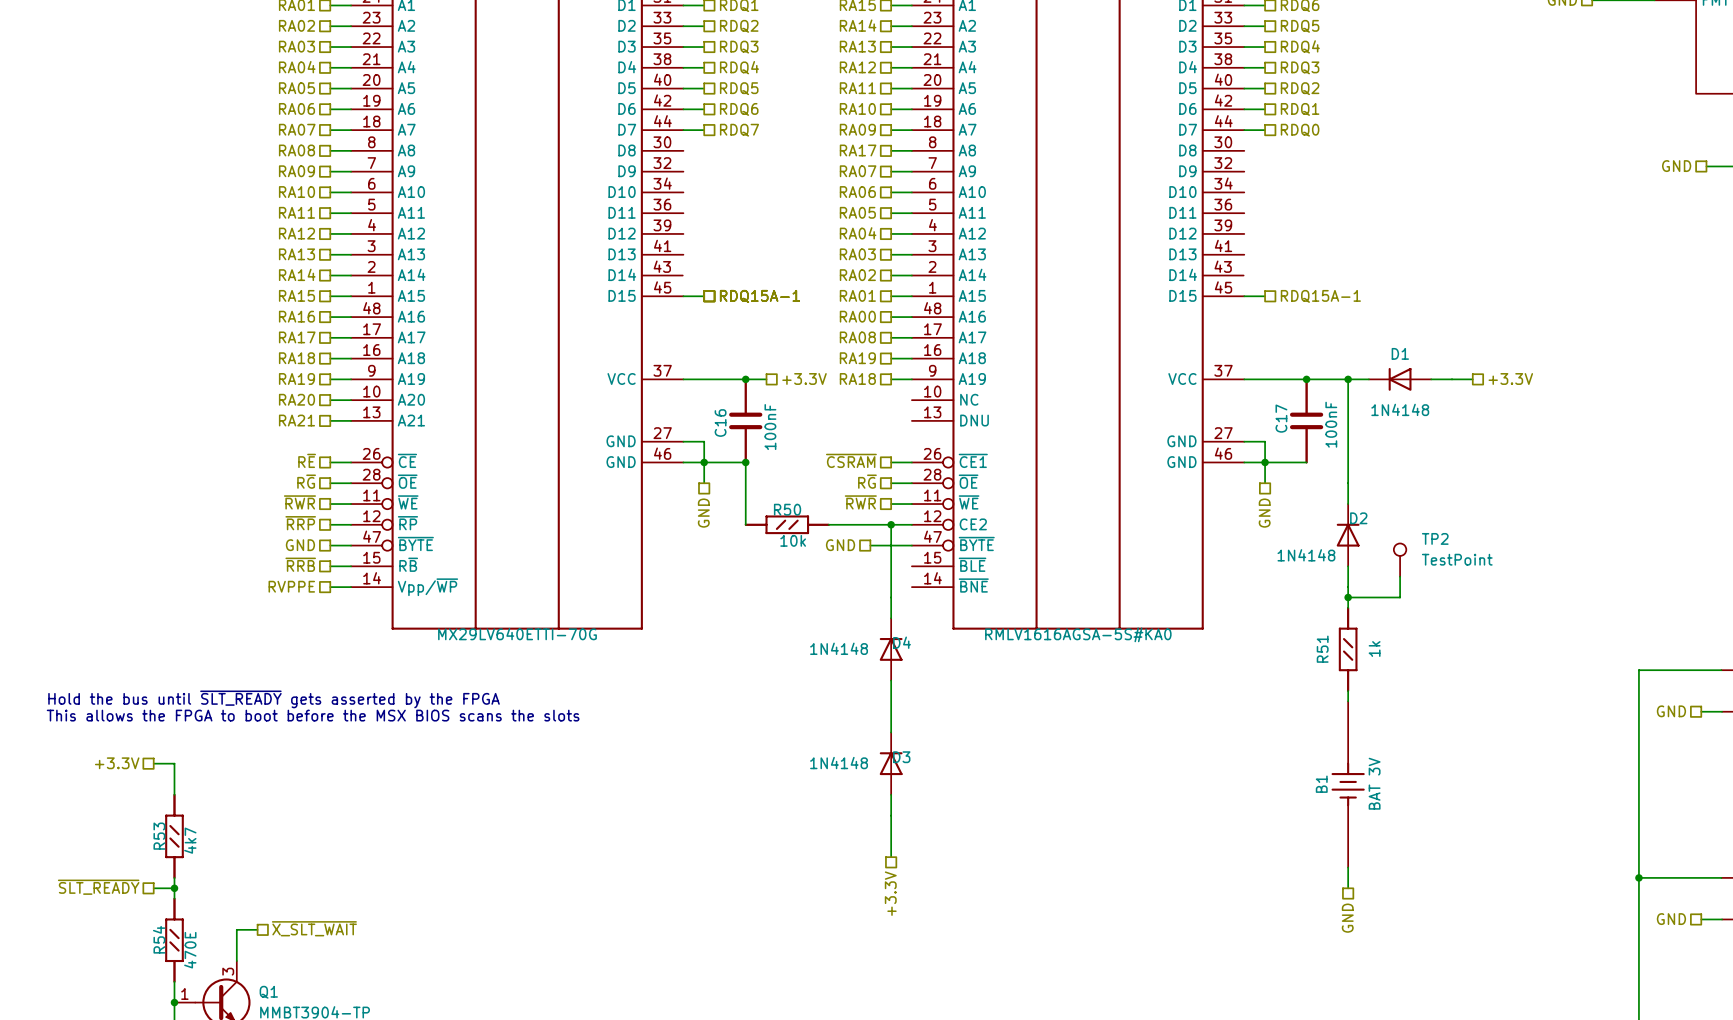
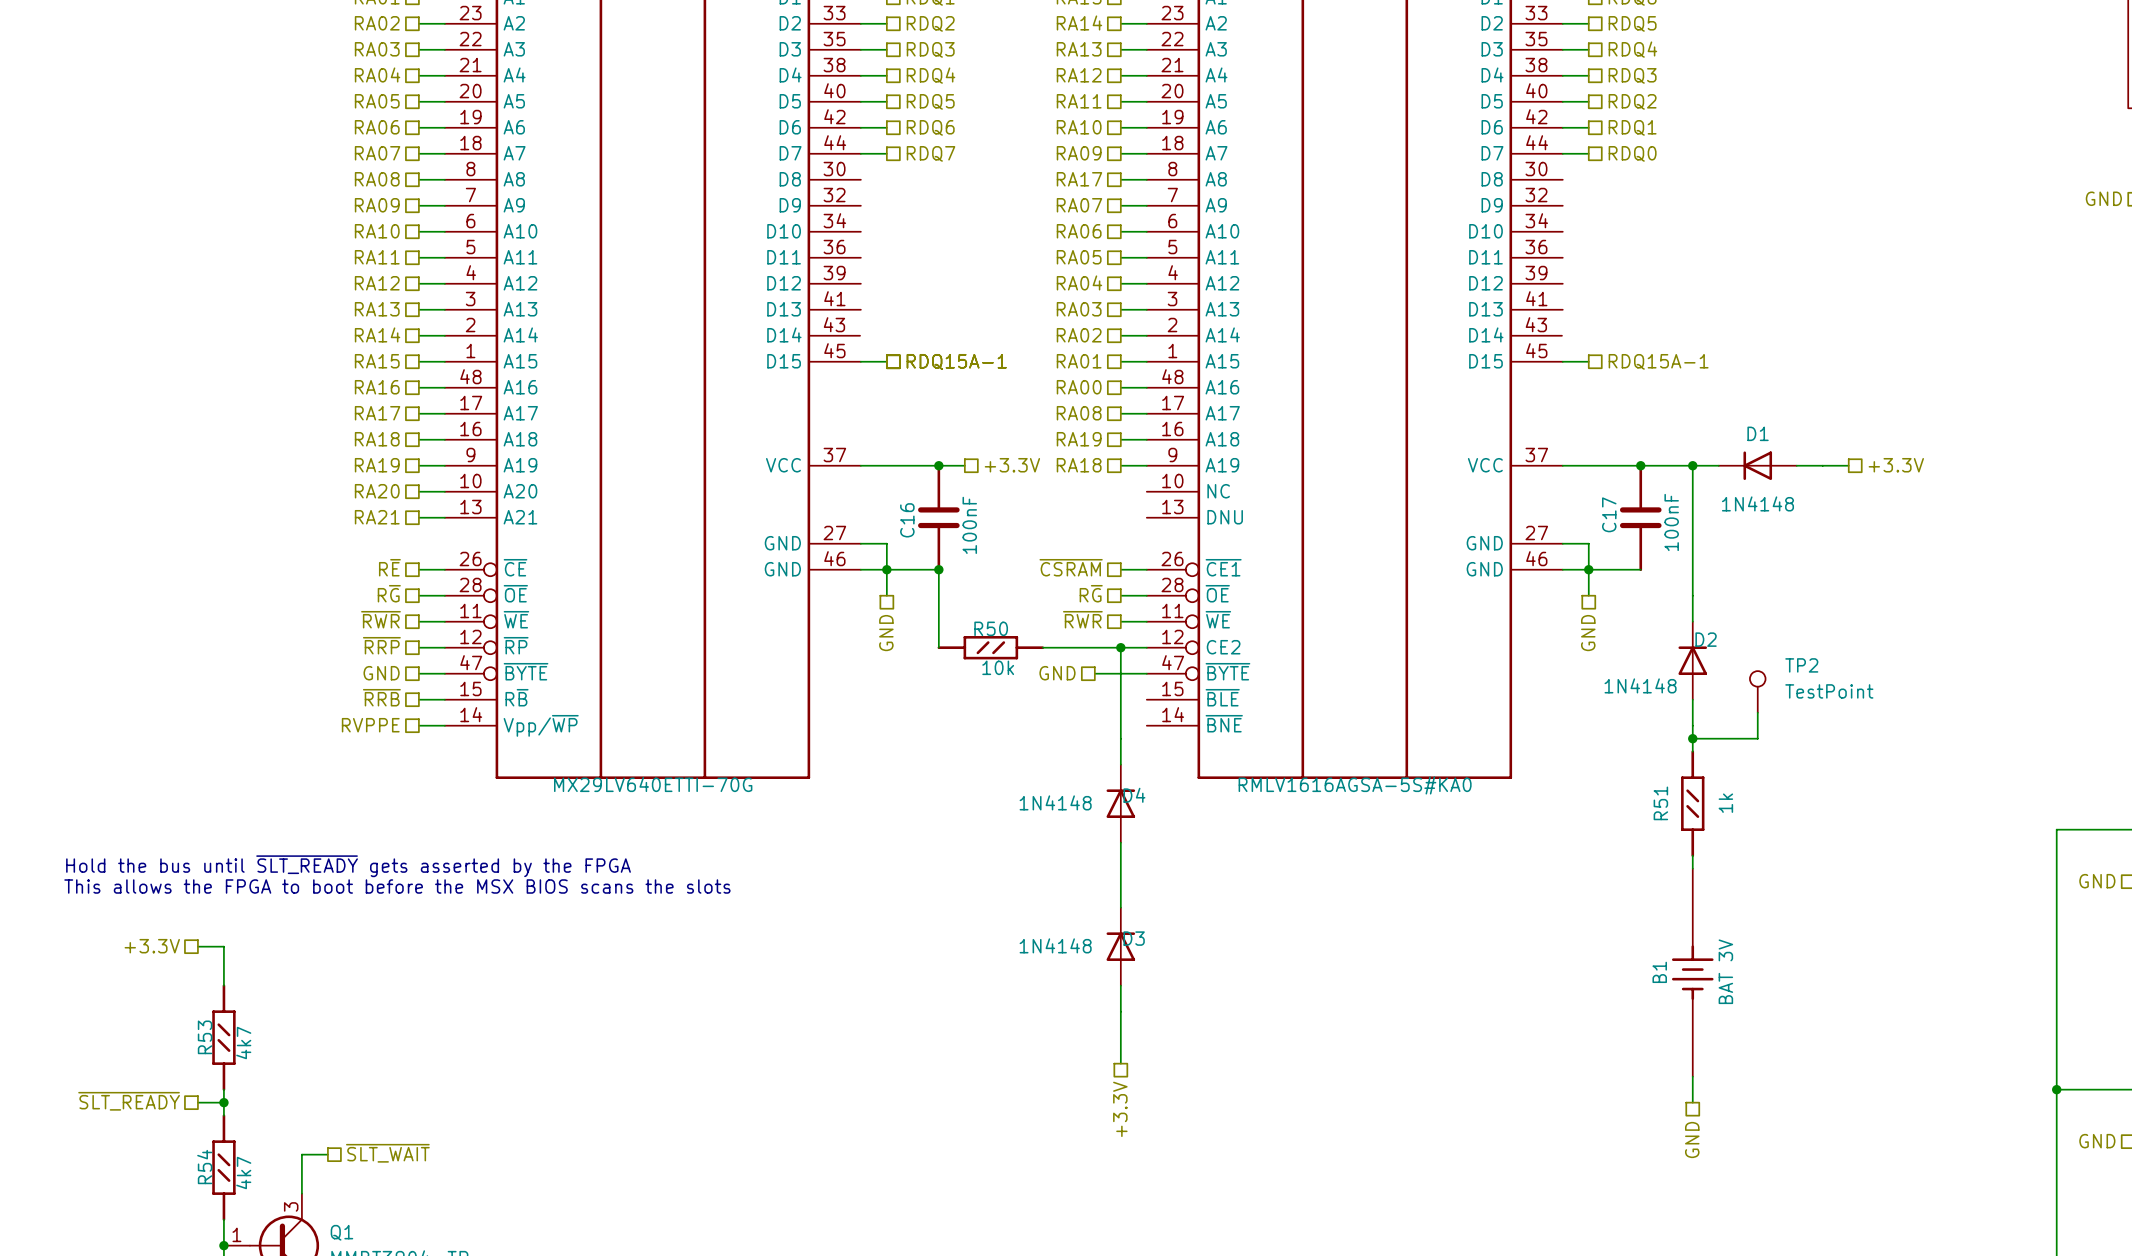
hierarchical label: ~{X_SLT_WAIT} (314, 928) -> ~{SLT_WAIT} (387, 1153)
R54 value: 470E (190, 950) -> 4k7 (243, 1173)

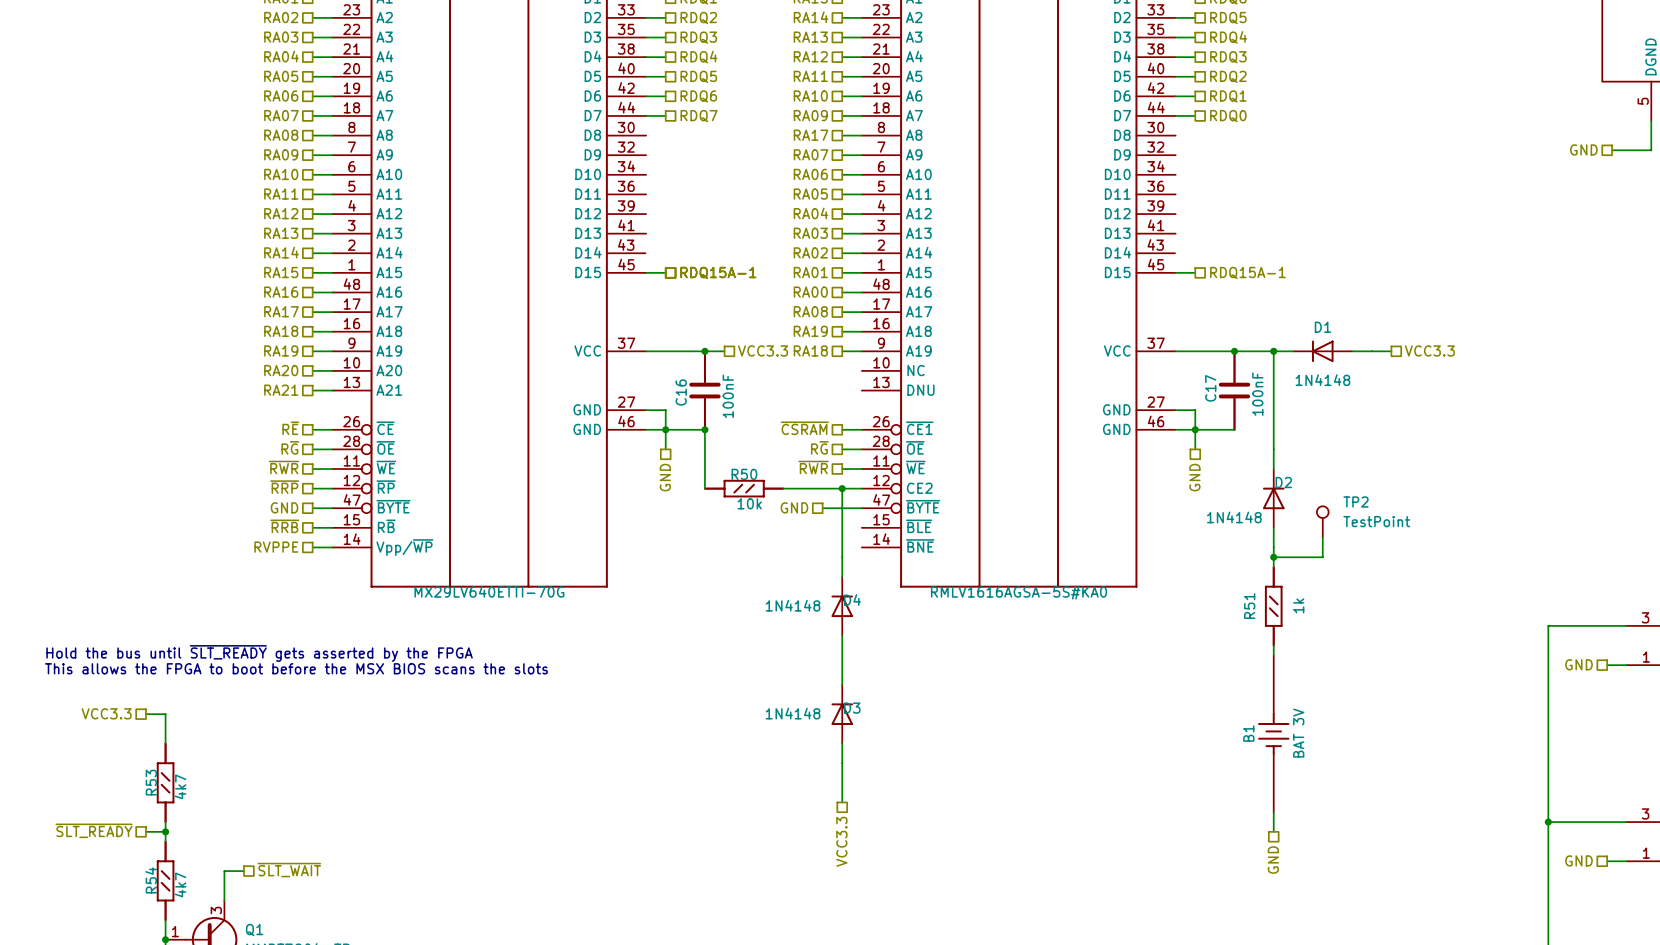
hierarchical label: +3.3V (1012, 465) -> VCC3.3 (763, 350)
hierarchical label: +3.3V (1896, 465) -> VCC3.3 (1429, 350)
hierarchical label: +3.3V (152, 946) -> VCC3.3 (106, 713)
hierarchical label: +3.3V (1120, 1109) -> VCC3.3 (841, 841)

